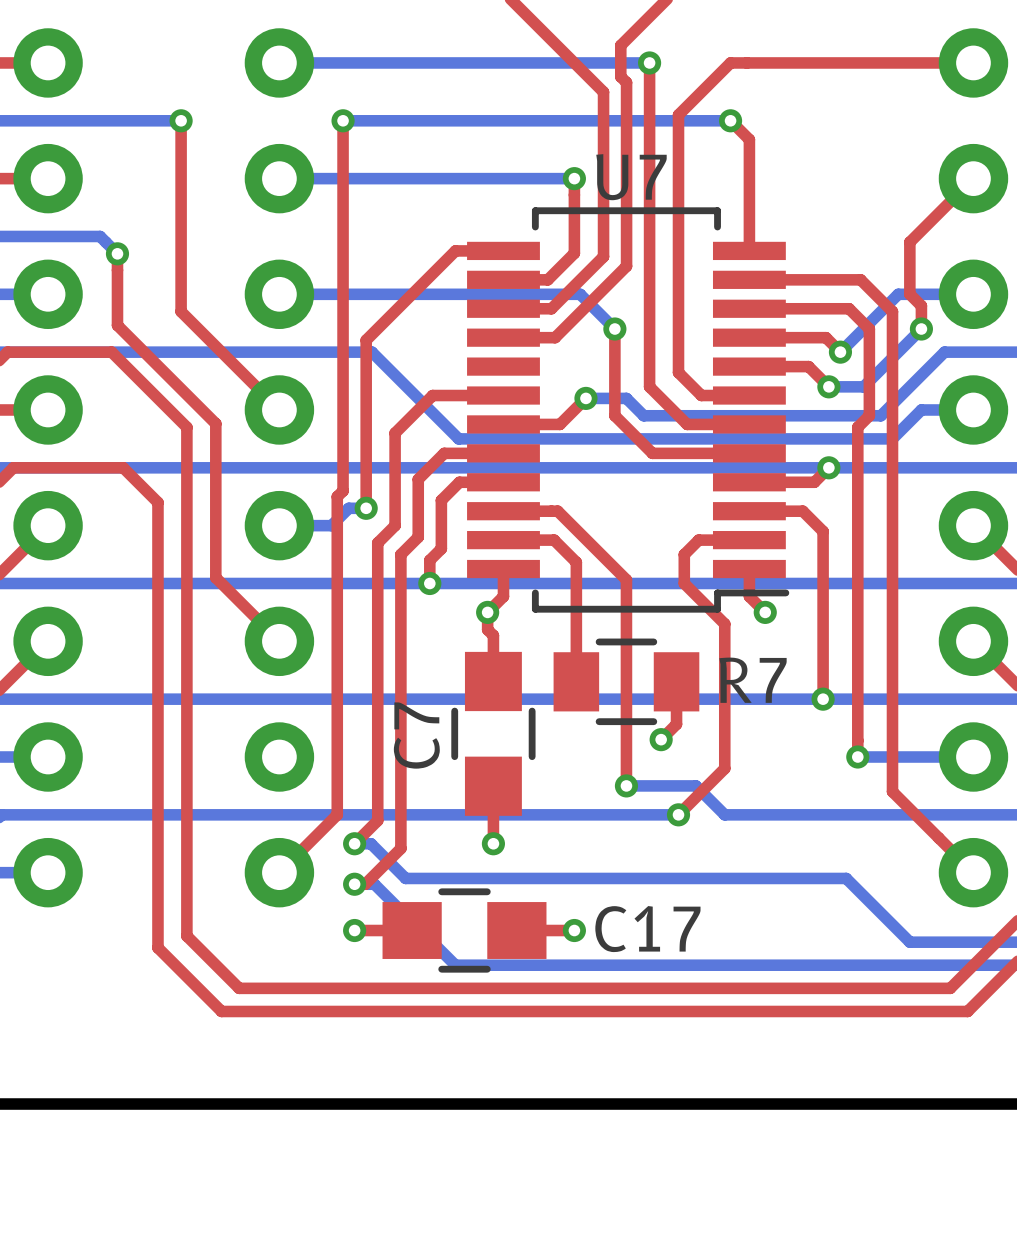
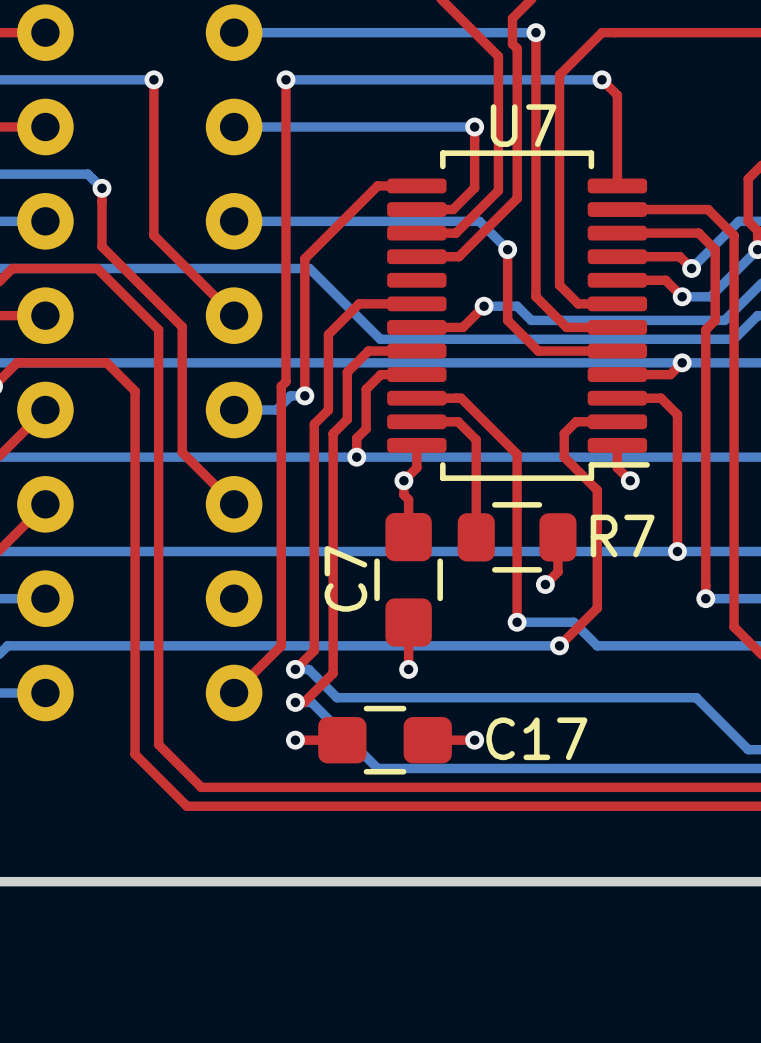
U7 footprint: [467, 207, 790, 613] -> [387, 150, 650, 481]
R7 footprint: [553, 638, 700, 726] -> [457, 502, 577, 573]
C7 footprint: [451, 651, 536, 816] -> [374, 512, 443, 647]
C17 footprint: [382, 888, 547, 973] -> [318, 705, 452, 775]

